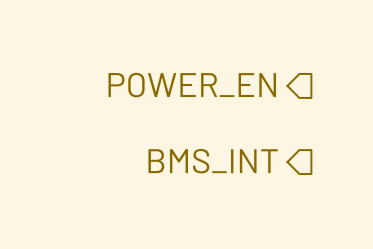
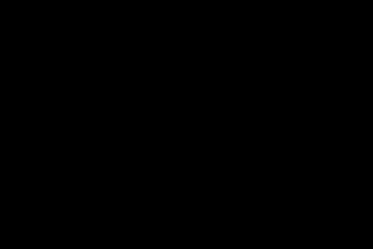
hierarchical label: POWER_EN (192, 85) -> none
hierarchical label: BMS_INT (213, 161) -> none

